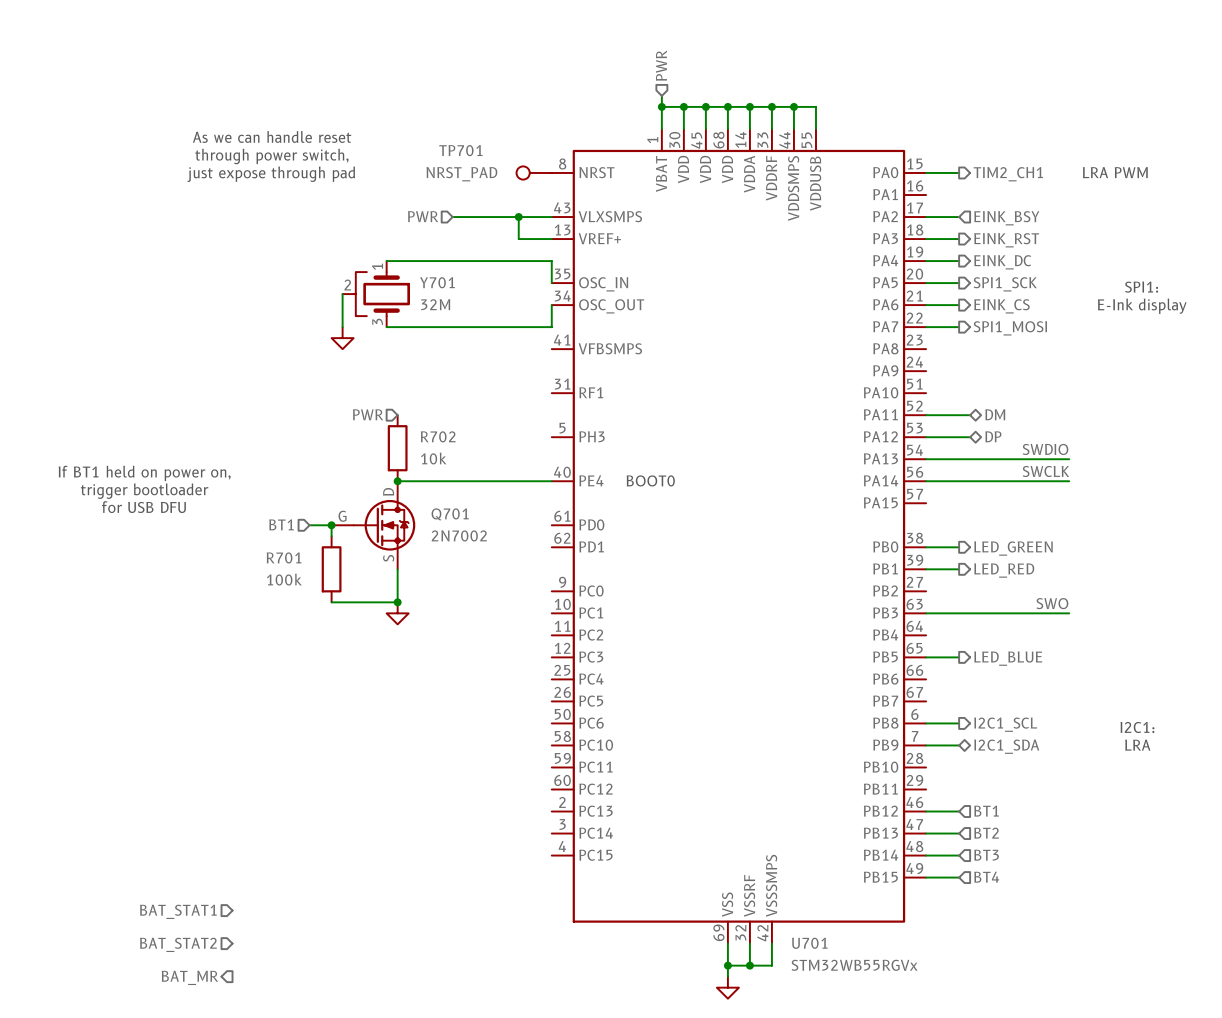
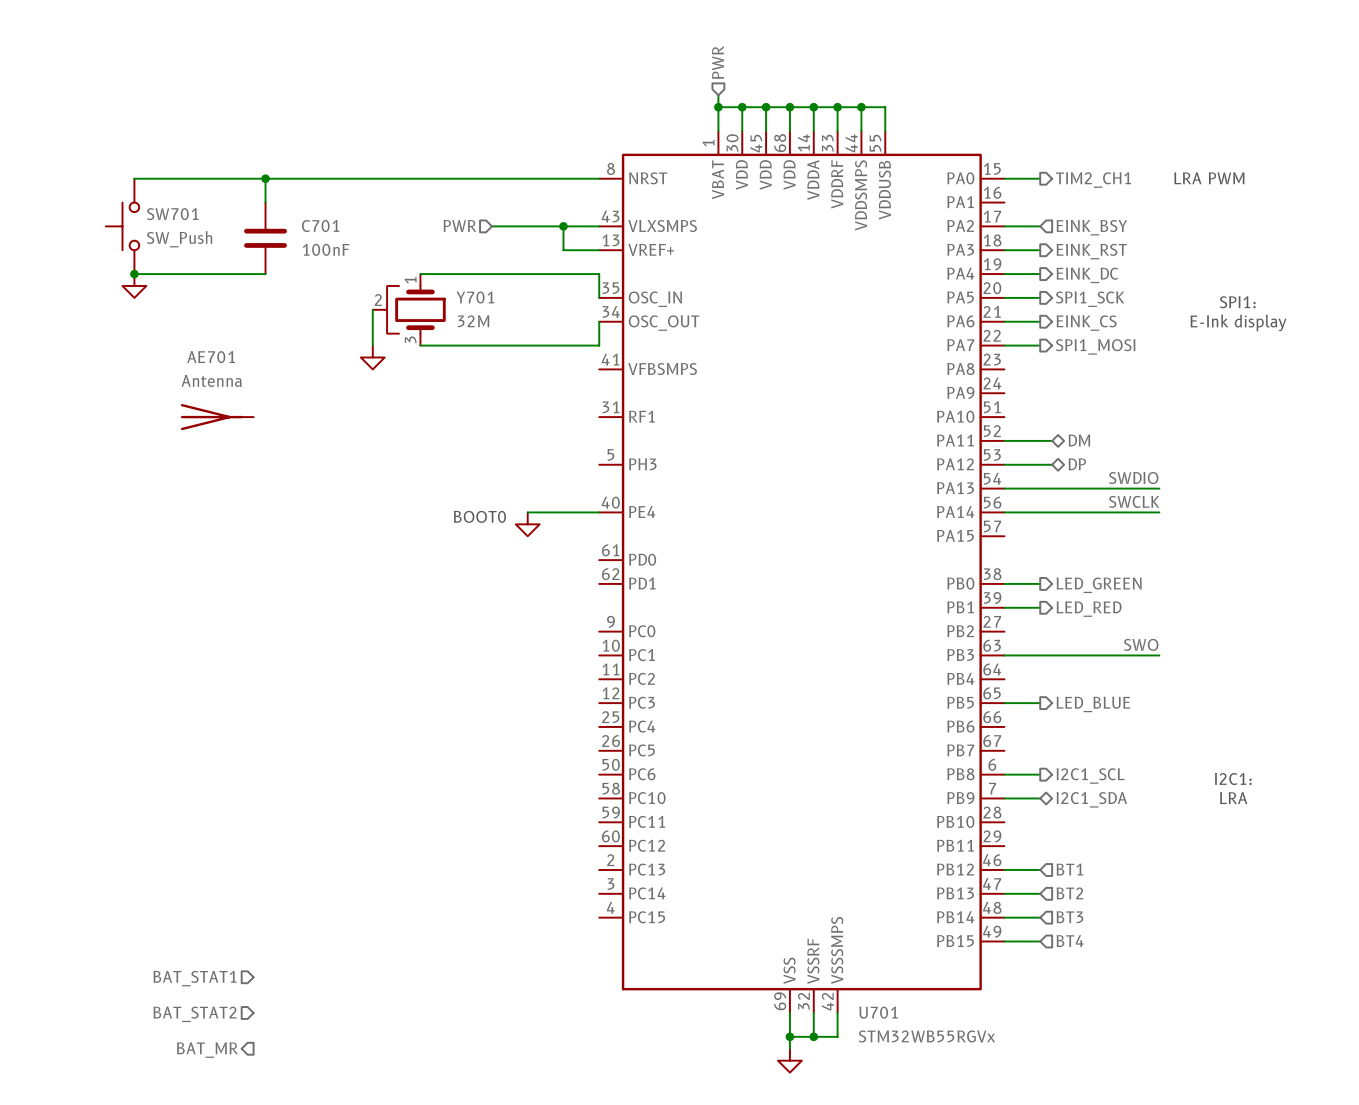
text: As we can handle reset (272, 136) -> none
text: through power switch, (271, 156) -> none
wire: none -> (134, 178) (599, 178)
wire: none -> (265, 178) (265, 202)
junction: none -> (265, 178)
TP701: NRST_PAD (534, 172) -> none
text: just expose through pad (271, 174) -> none
SW701: none -> SW_Push (122, 226)
C701: none -> 100nF (265, 238)
wire: none -> (134, 274) (265, 274)
junction: none -> (134, 274)
power symbol: none -> (134, 285)
AE701: none -> Antenna (217, 417)
hierarchical label: PWR (368, 414) -> none
R702: 10k (397, 448) -> none
text: If BT1 held on power on, (144, 473) -> none
text position: BOOT0 (650, 480) -> BOOT0 (479, 516)
wire: (397, 481) (485, 481) -> none
junction: (397, 481) -> none
text: trigger bootloader (144, 491) -> none
text: for USB DFU (143, 507) -> none
hierarchical label: BT1 (281, 524) -> none
wire: (309, 525) (331, 525) (331, 536) -> none
junction: (331, 525) -> none
Q701: 2N7002 (373, 525) -> none
R701: 100k (331, 569) -> none
wire: (397, 569) (397, 602) (331, 602) -> none
junction: (397, 602) -> none
power symbol position: (397, 613) -> (527, 524)

